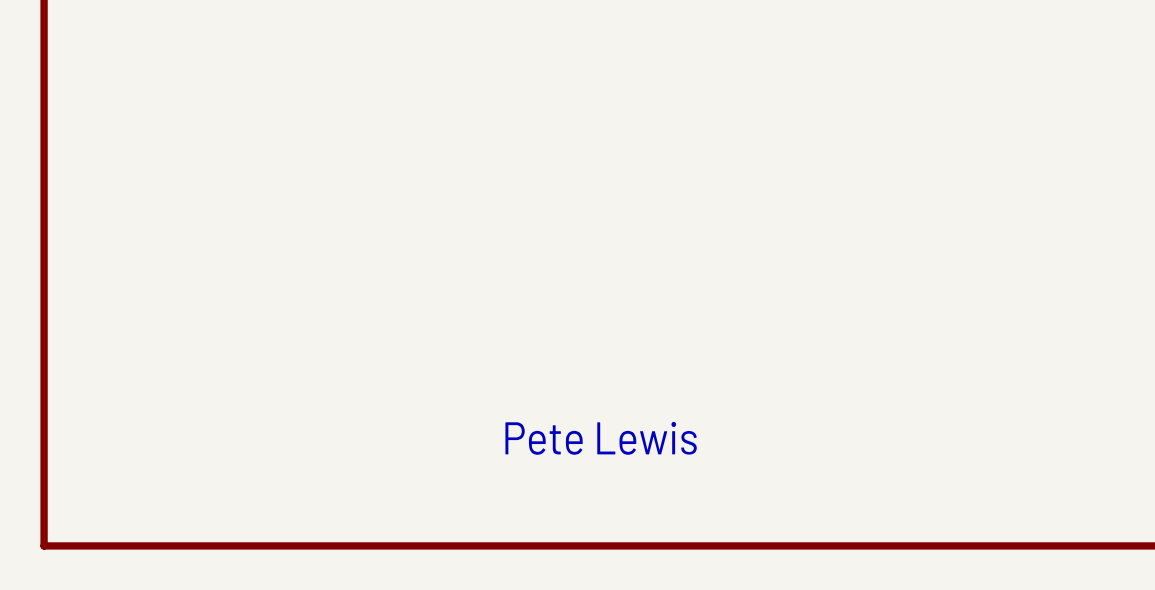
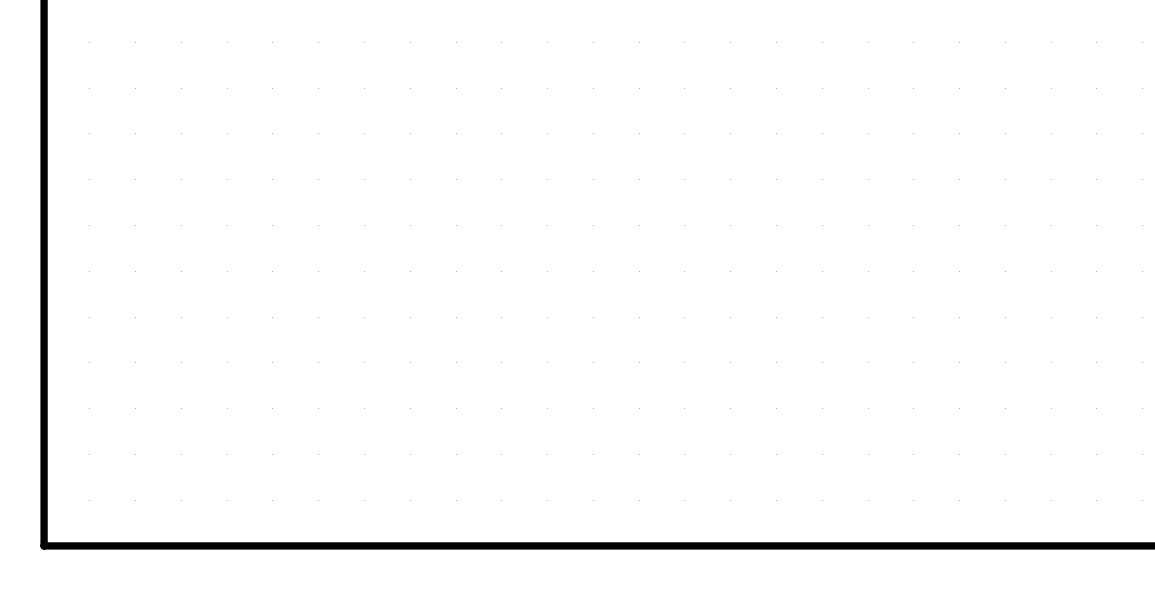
text: Pete Lewis (601, 438) -> none

